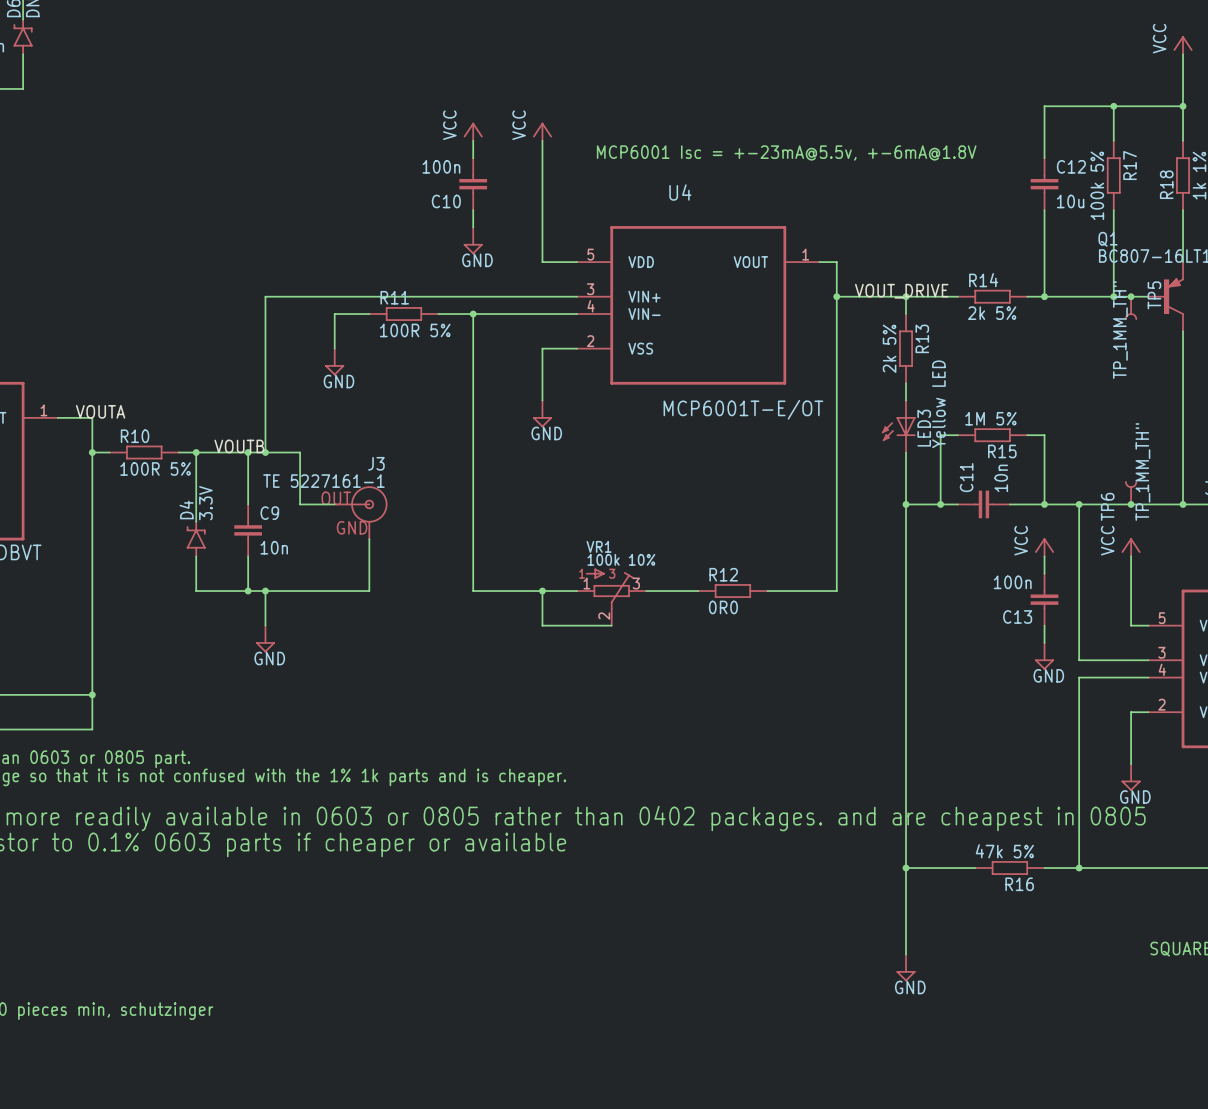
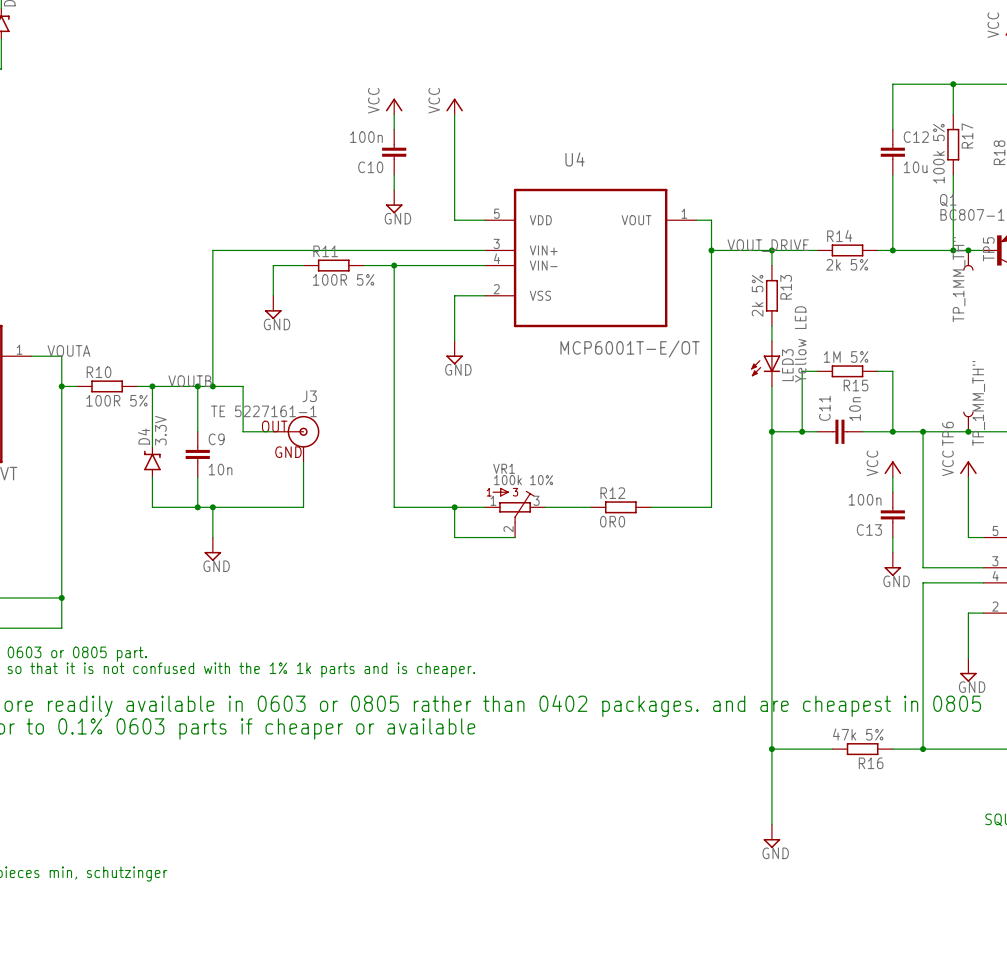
text: MCP6001 Isc = +-23mA@5.5v, +-6mA@1.8V (786, 153) -> none

